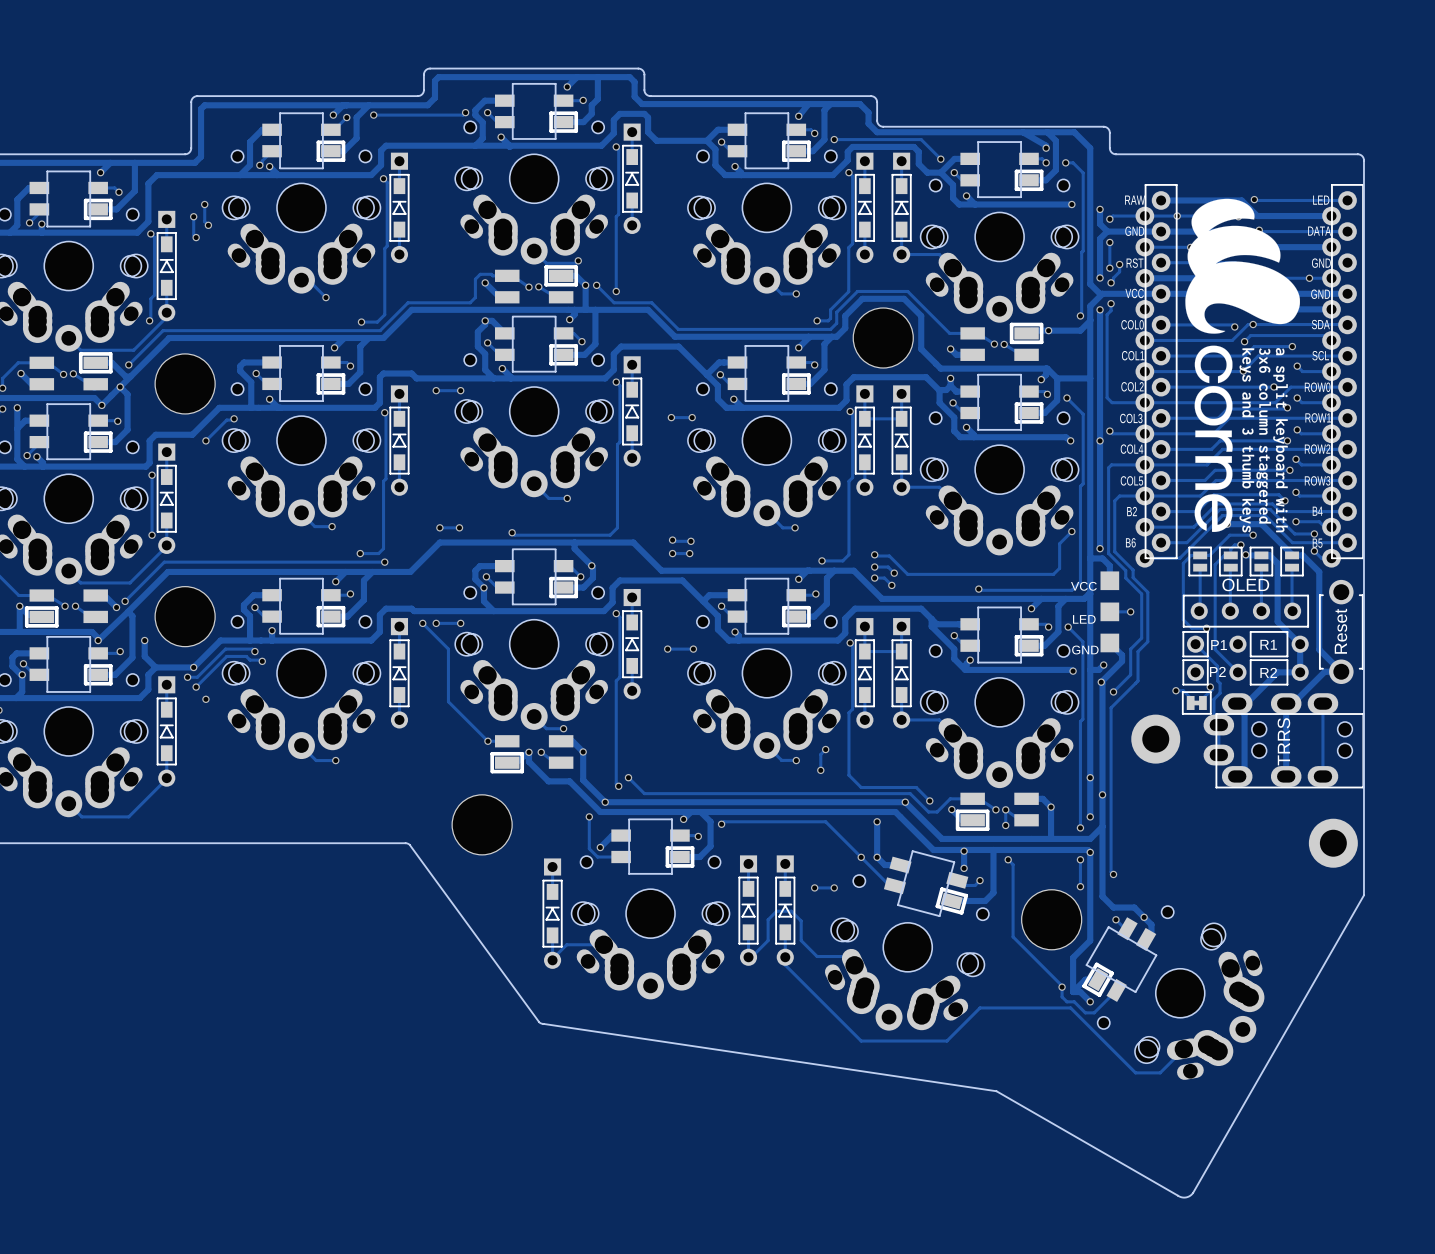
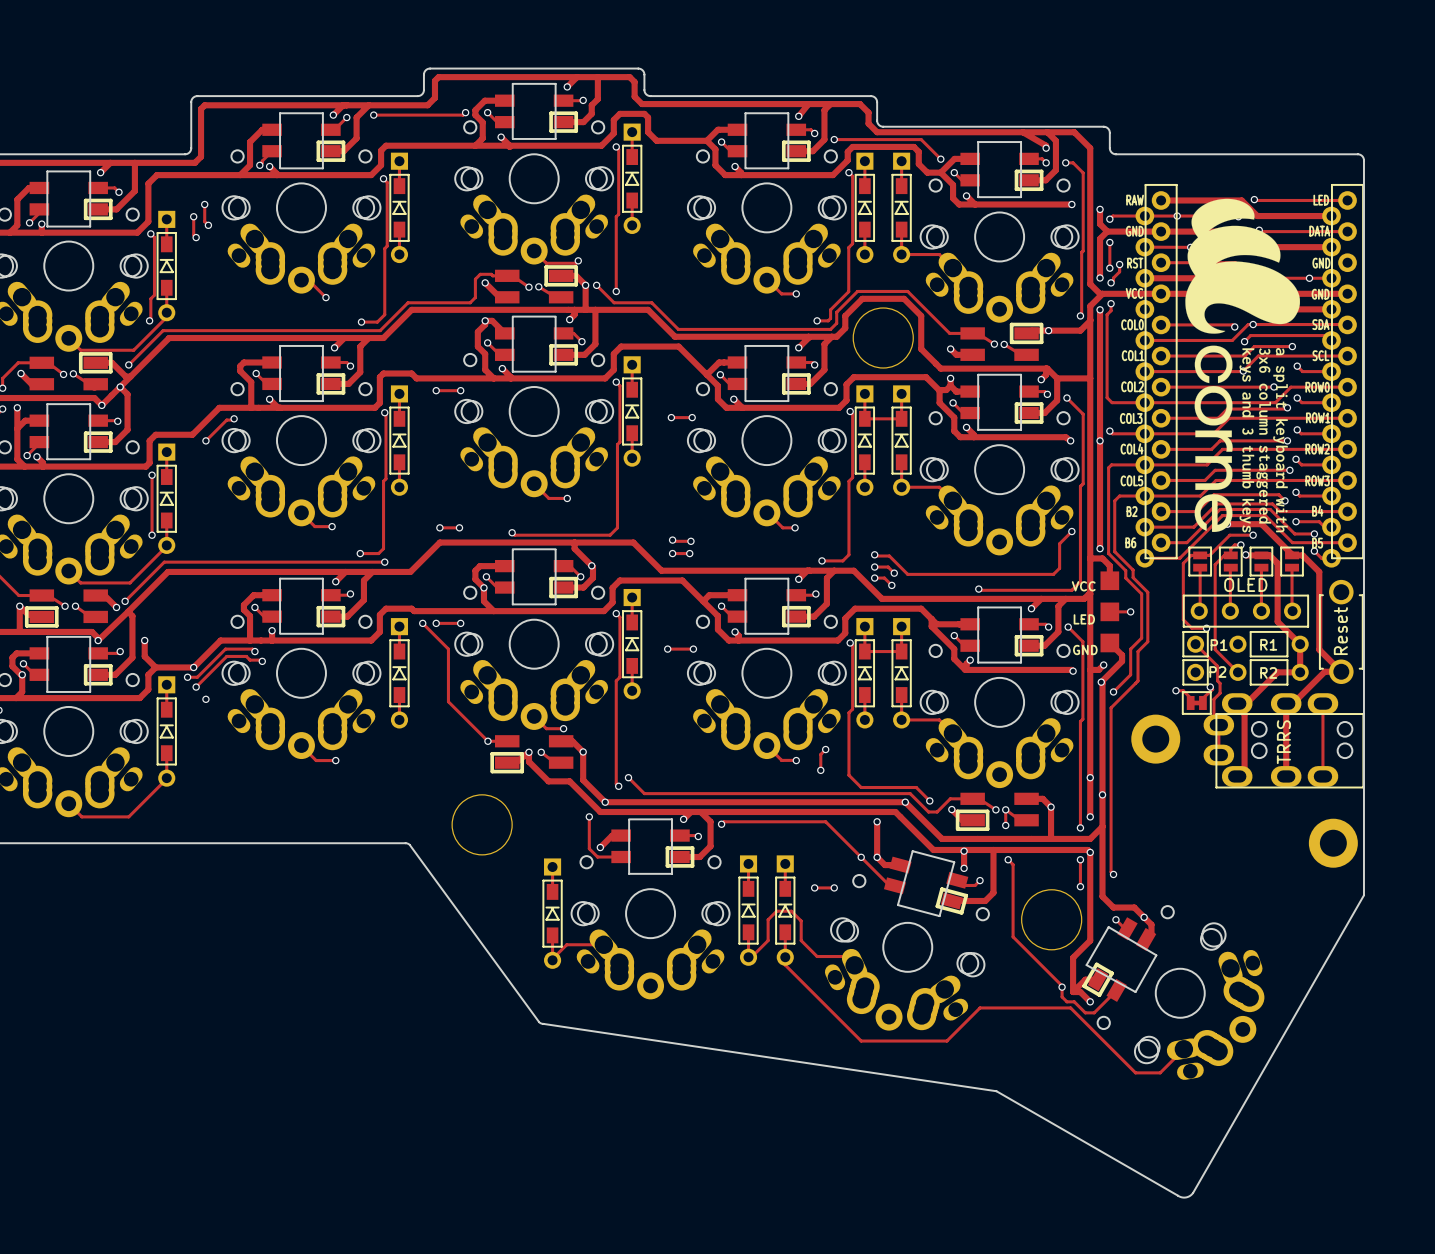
part: (185, 383) -> none
part: (185, 616) -> none

